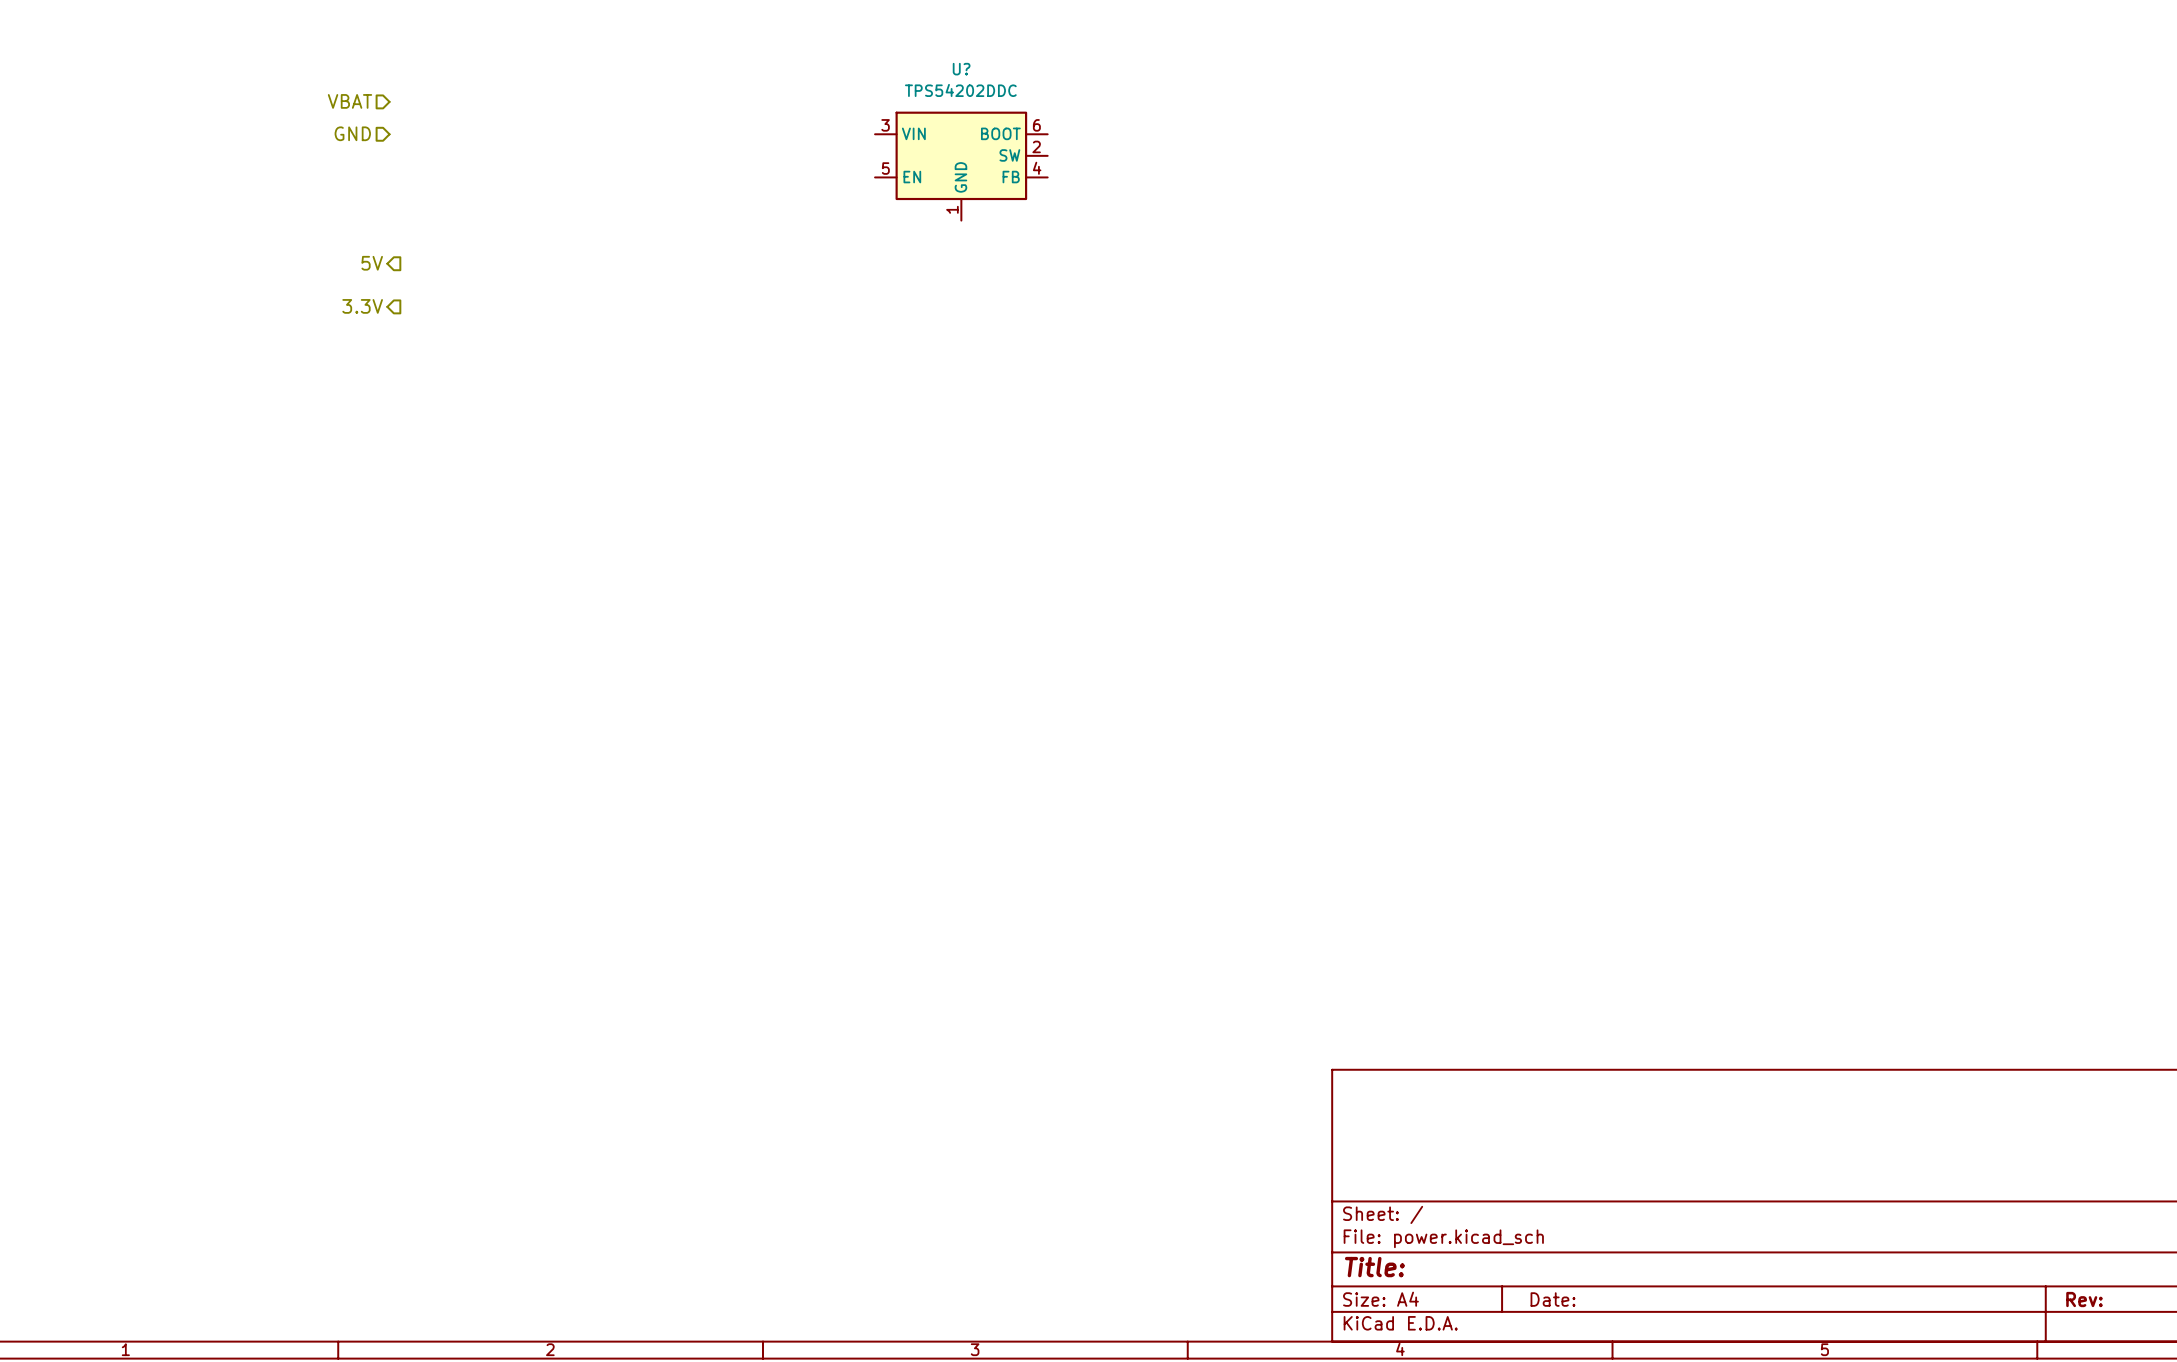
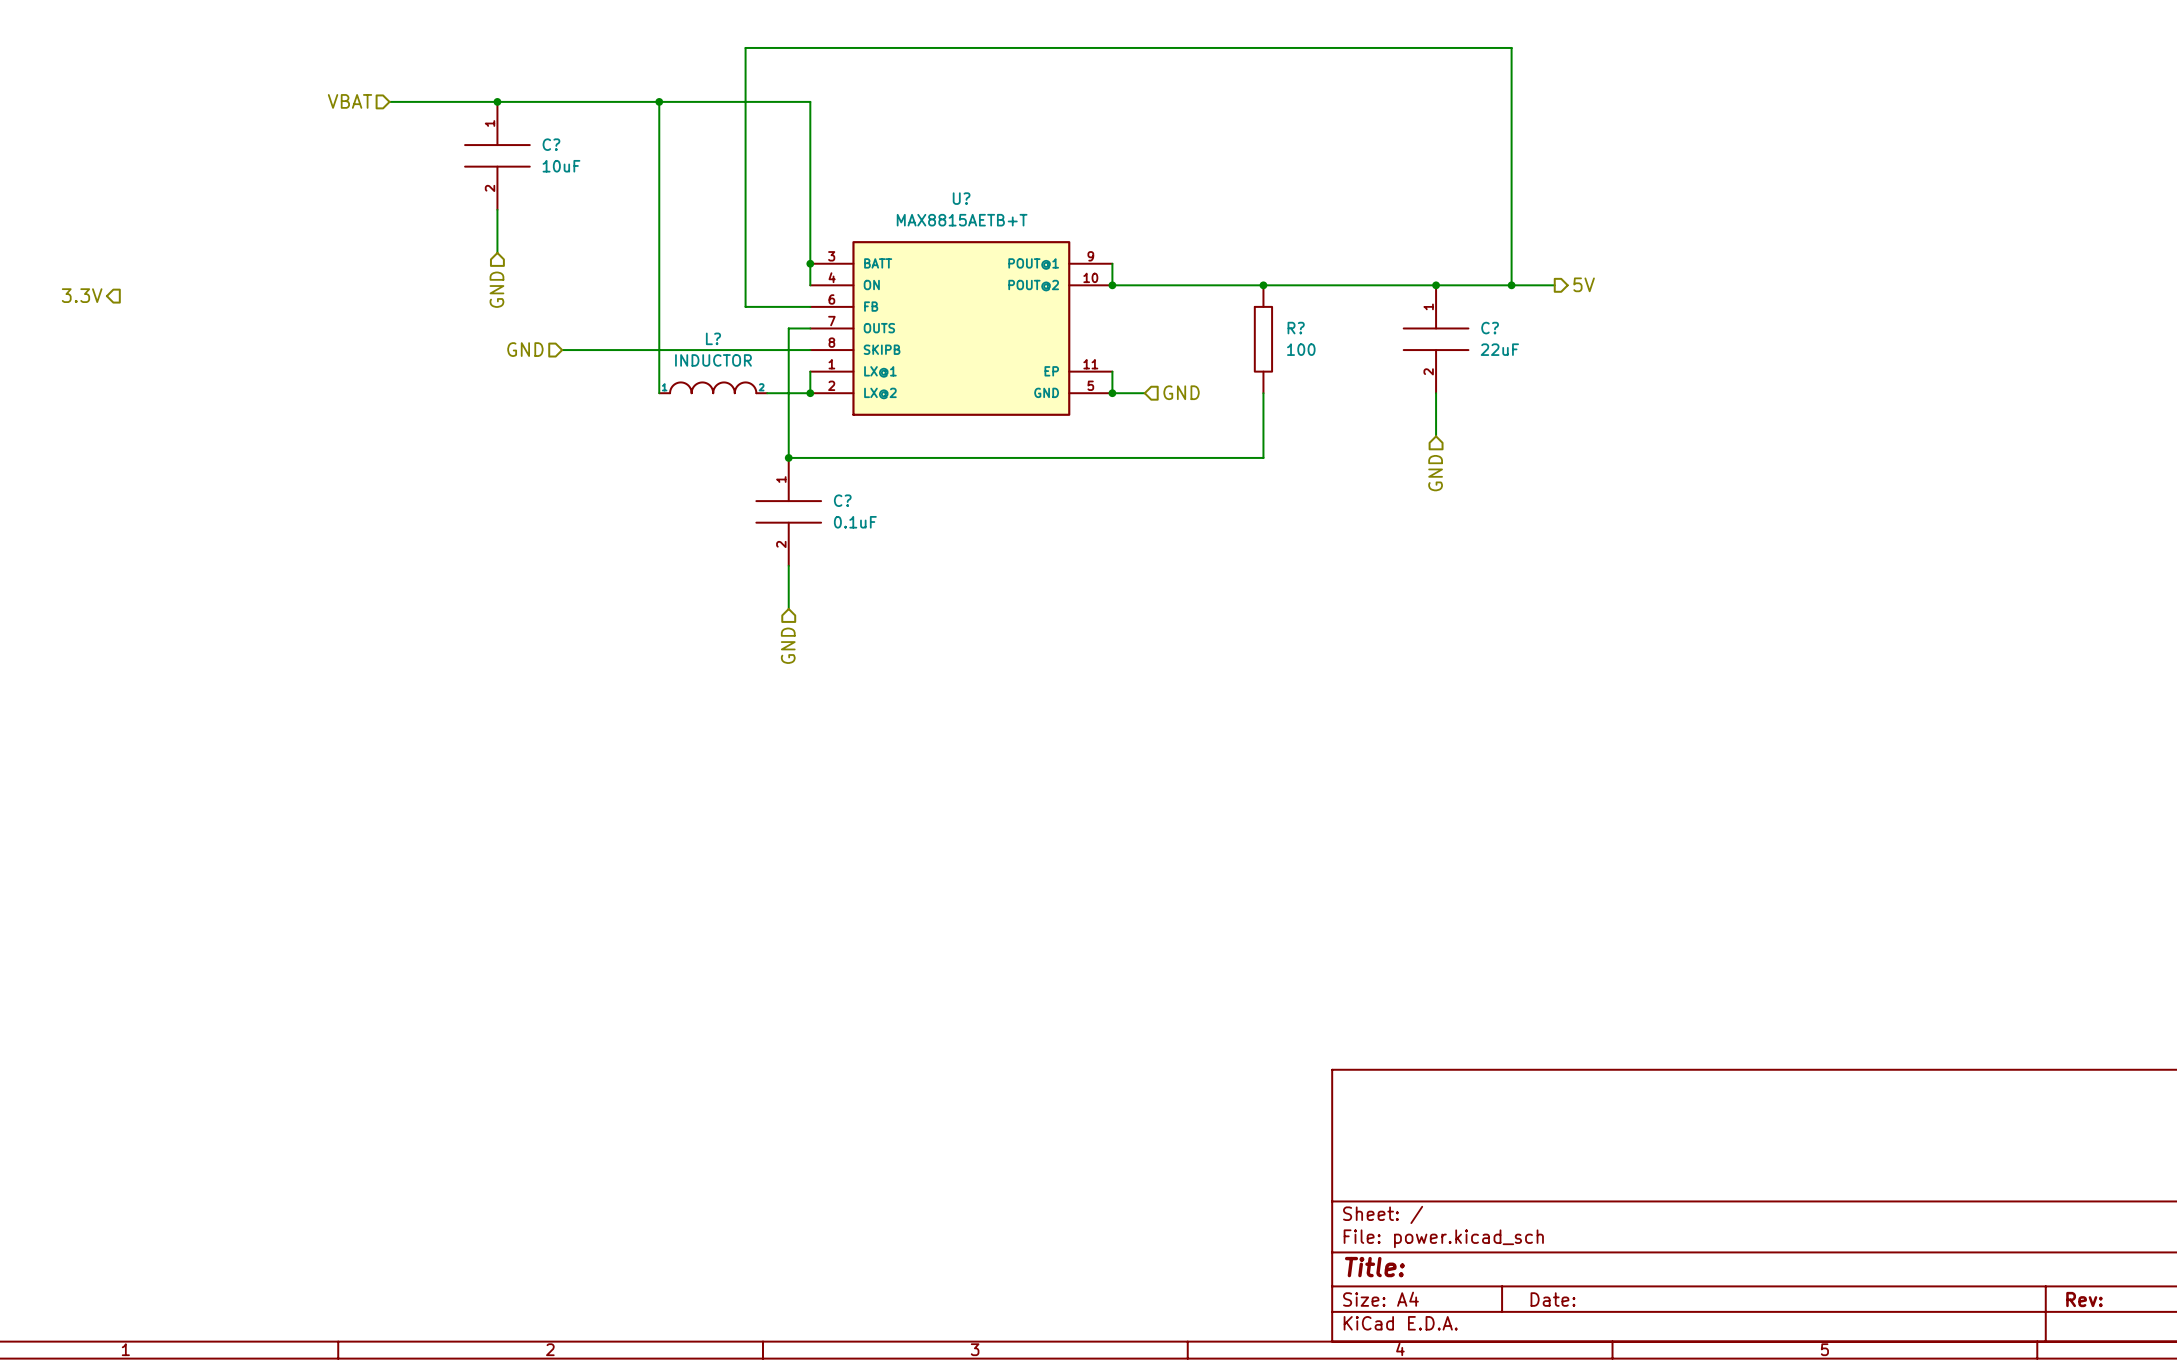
wire: none -> (389, 101) (810, 101) (810, 285)
junction: none -> (497, 101)
wire: none -> (659, 101) (659, 393)
junction: none -> (659, 101)
hierarchical label: GND (352, 133) -> none
C?: none -> 10uF (497, 155)
U?: TPS54202DDC (961, 166) -> none
wire: none -> (497, 209) (497, 252)
hierarchical label: 5V (372, 263) -> none
junction: none -> (810, 263)
wire: none -> (1112, 263) (1112, 285) (1554, 285)
hierarchical label: none -> 5V (1584, 284)
junction: none -> (1112, 285)
junction: none -> (1263, 285)
junction: none -> (1436, 285)
wire: none -> (1511, 285) (1511, 47) (745, 47) (745, 306) (810, 306)
junction: none -> (1511, 285)
hierarchical label: none -> GND (496, 289)
hierarchical label: none -> 3.3V (82, 295)
hierarchical label: 3.3V (362, 306) -> none
wire: none -> (810, 328) (788, 328) (788, 457) (1263, 457) (1263, 393)
U?: none -> MAX8815AETB+T (961, 328)
R?: none -> 100 (1263, 339)
C?: none -> 22uF (1436, 339)
hierarchical label: none -> GND (525, 349)
wire: none -> (562, 350) (810, 350)
wire: none -> (810, 371) (810, 393) (767, 393)
wire: none -> (1112, 371) (1112, 393) (1144, 393)
L?: none -> INDUCTOR (713, 387)
hierarchical label: none -> GND (1181, 392)
junction: none -> (810, 393)
junction: none -> (1112, 393)
wire: none -> (1436, 393) (1436, 436)
junction: none -> (788, 457)
hierarchical label: none -> GND (1435, 473)
C?: none -> 0.1uF (788, 511)
wire: none -> (788, 565) (788, 608)
hierarchical label: none -> GND (788, 645)

